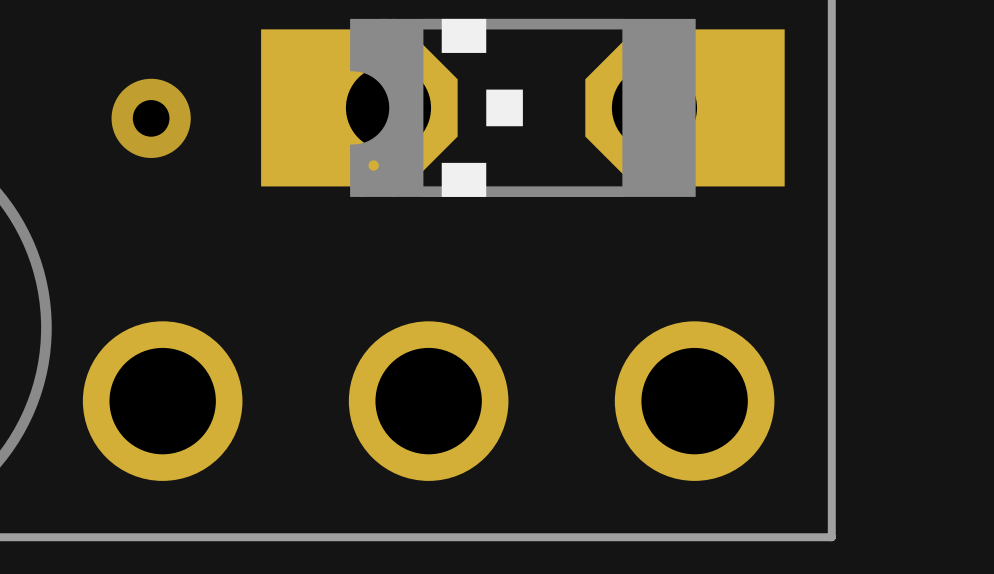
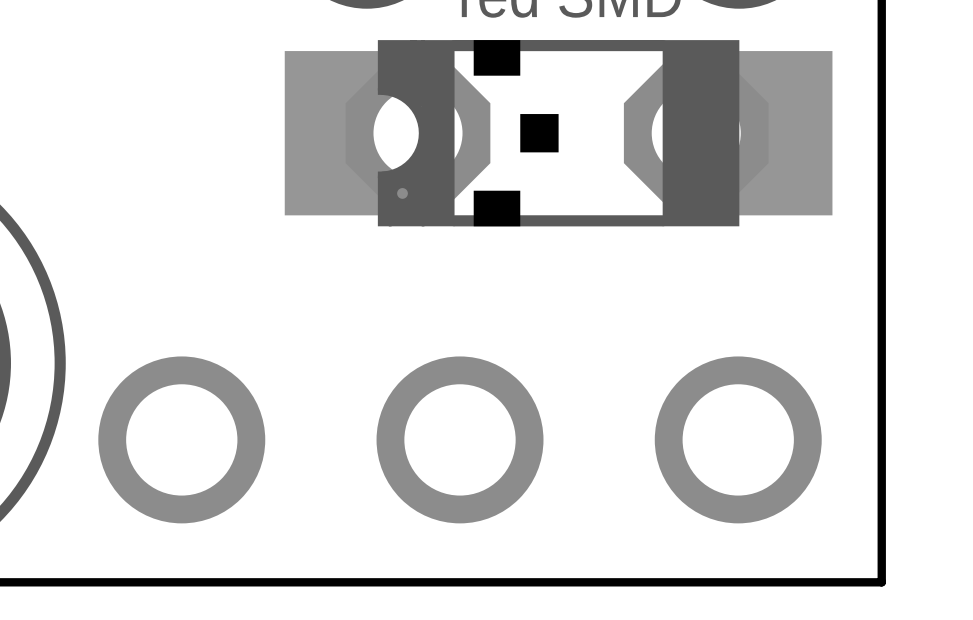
via: (151, 118) -> none

